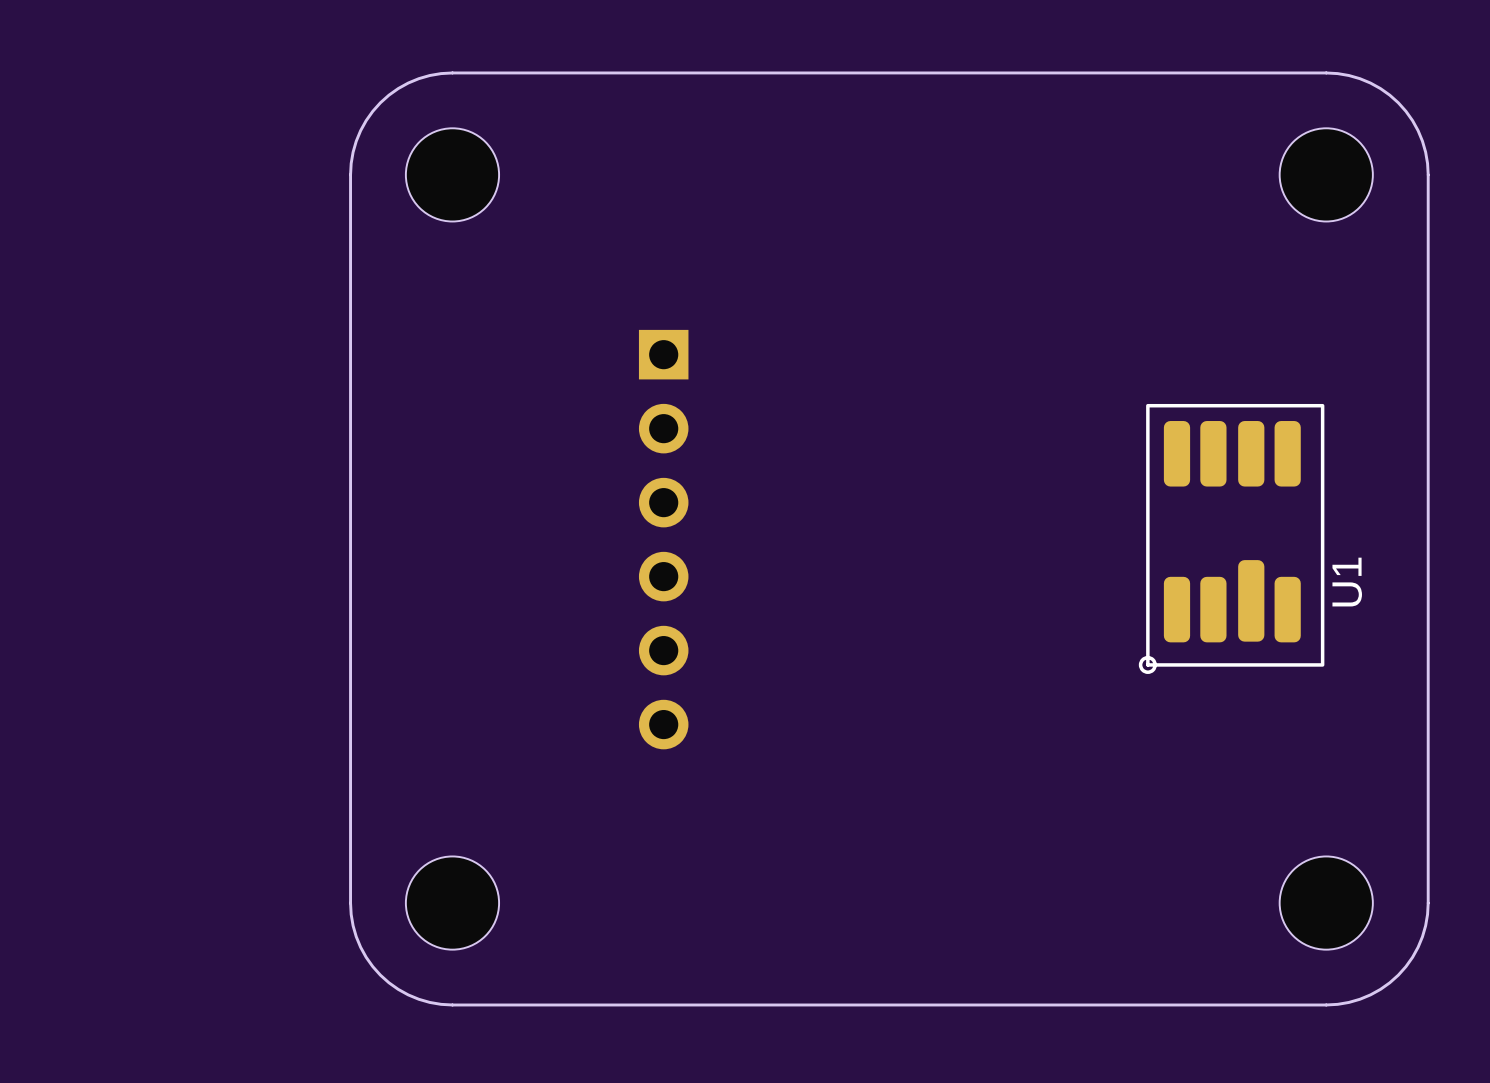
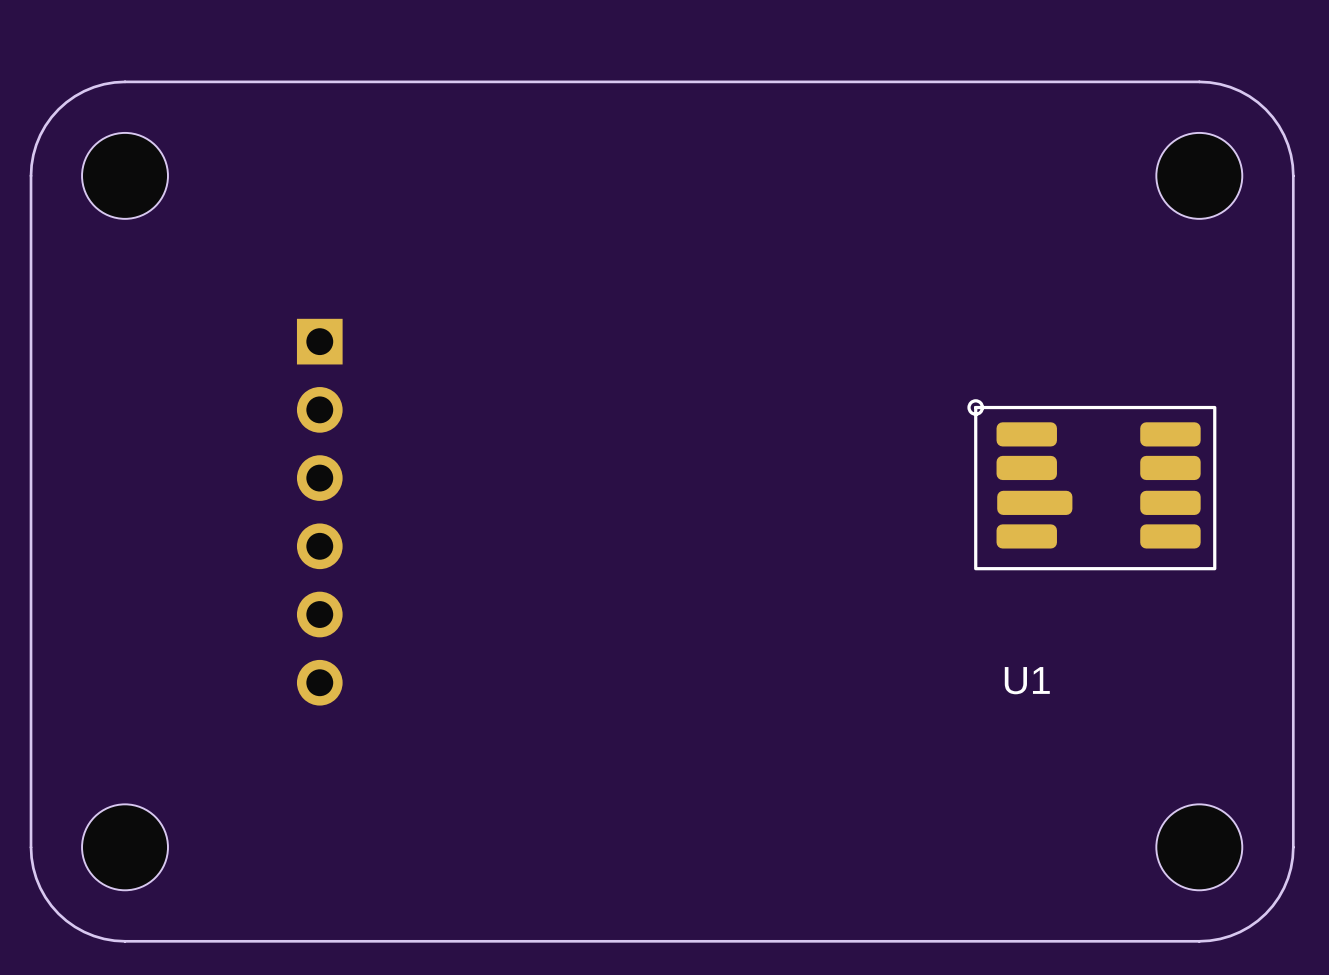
board edge: (452, 72) (418, 78) (398, 88) (380, 102) (366, 120) (356, 141) (350, 174) (351, 914) (360, 947) (380, 975) (398, 989) (418, 999) (452, 1004) -> (393, 81) (125, 81) (104, 84) (75, 96) (51, 117) (36, 144) (31, 175) (31, 847) (33, 868) (40, 888) (51, 905) (75, 926) (93, 936) (114, 940) (393, 941)
part position: (452, 174) -> (125, 175)
U1 rotation: 0° (1231, 538) -> 90° clockwise (1091, 484)
part position: (663, 539) -> (319, 512)
U1 name position: U1 (1347, 582) -> U1 (1027, 680)
part position: (452, 903) -> (125, 847)

